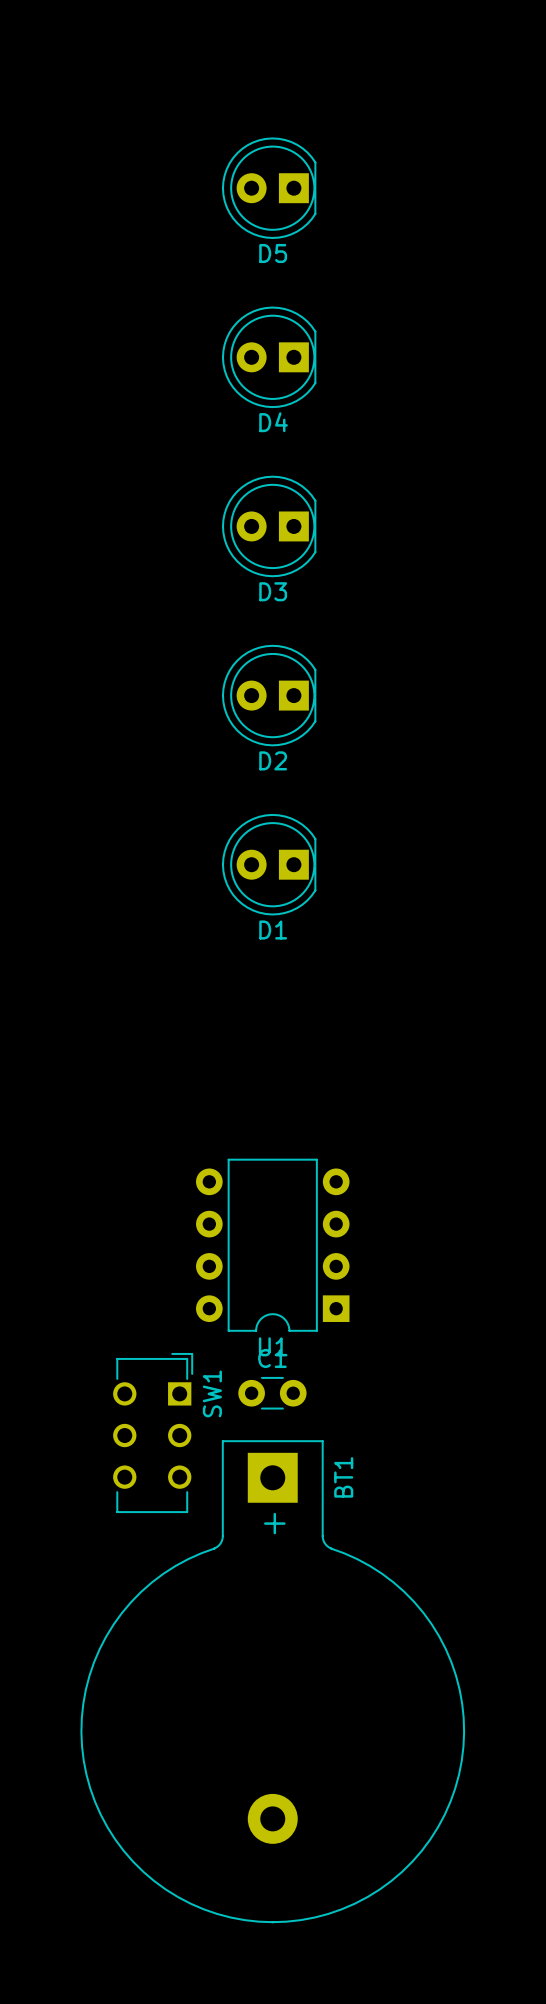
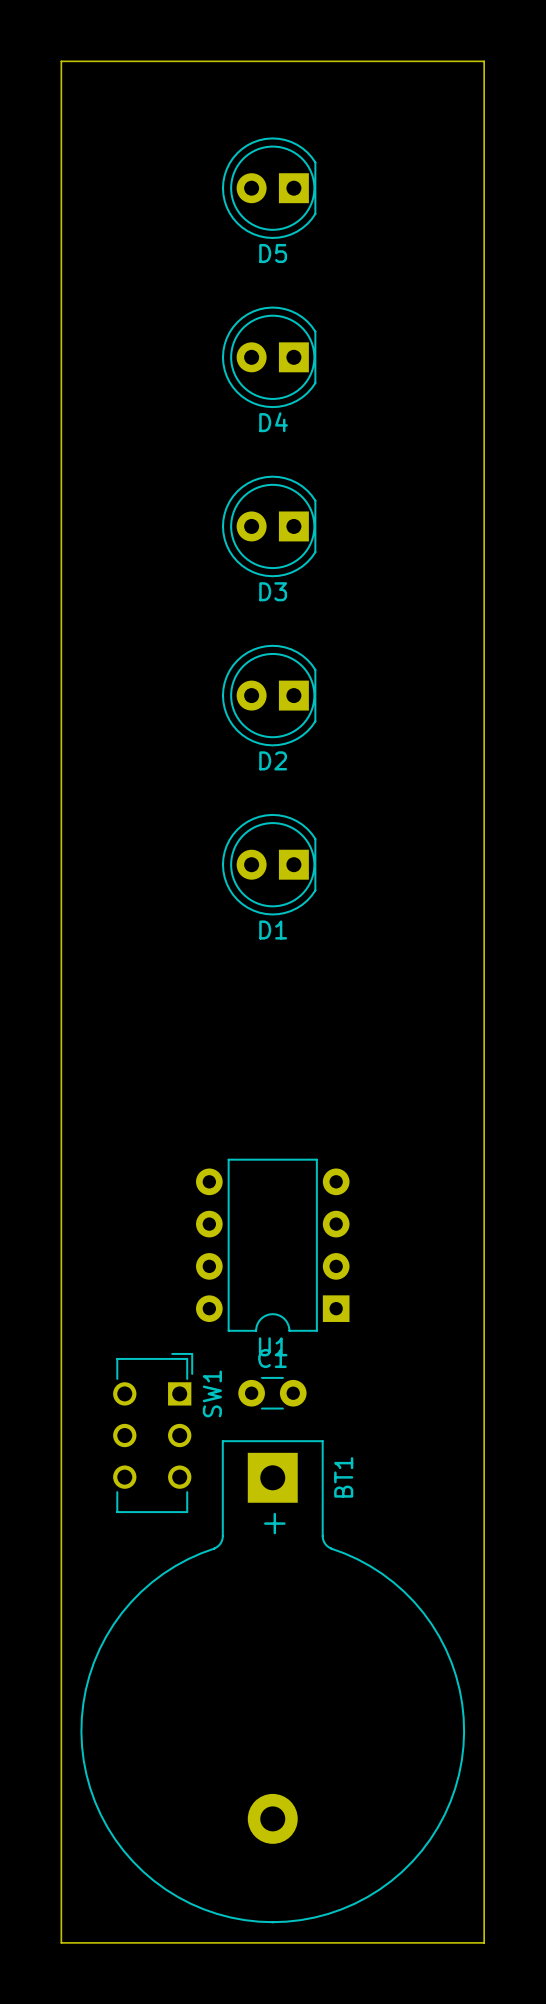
board edge: none -> (61, 61) (484, 61) (484, 1942) (61, 1942) (61, 61)

